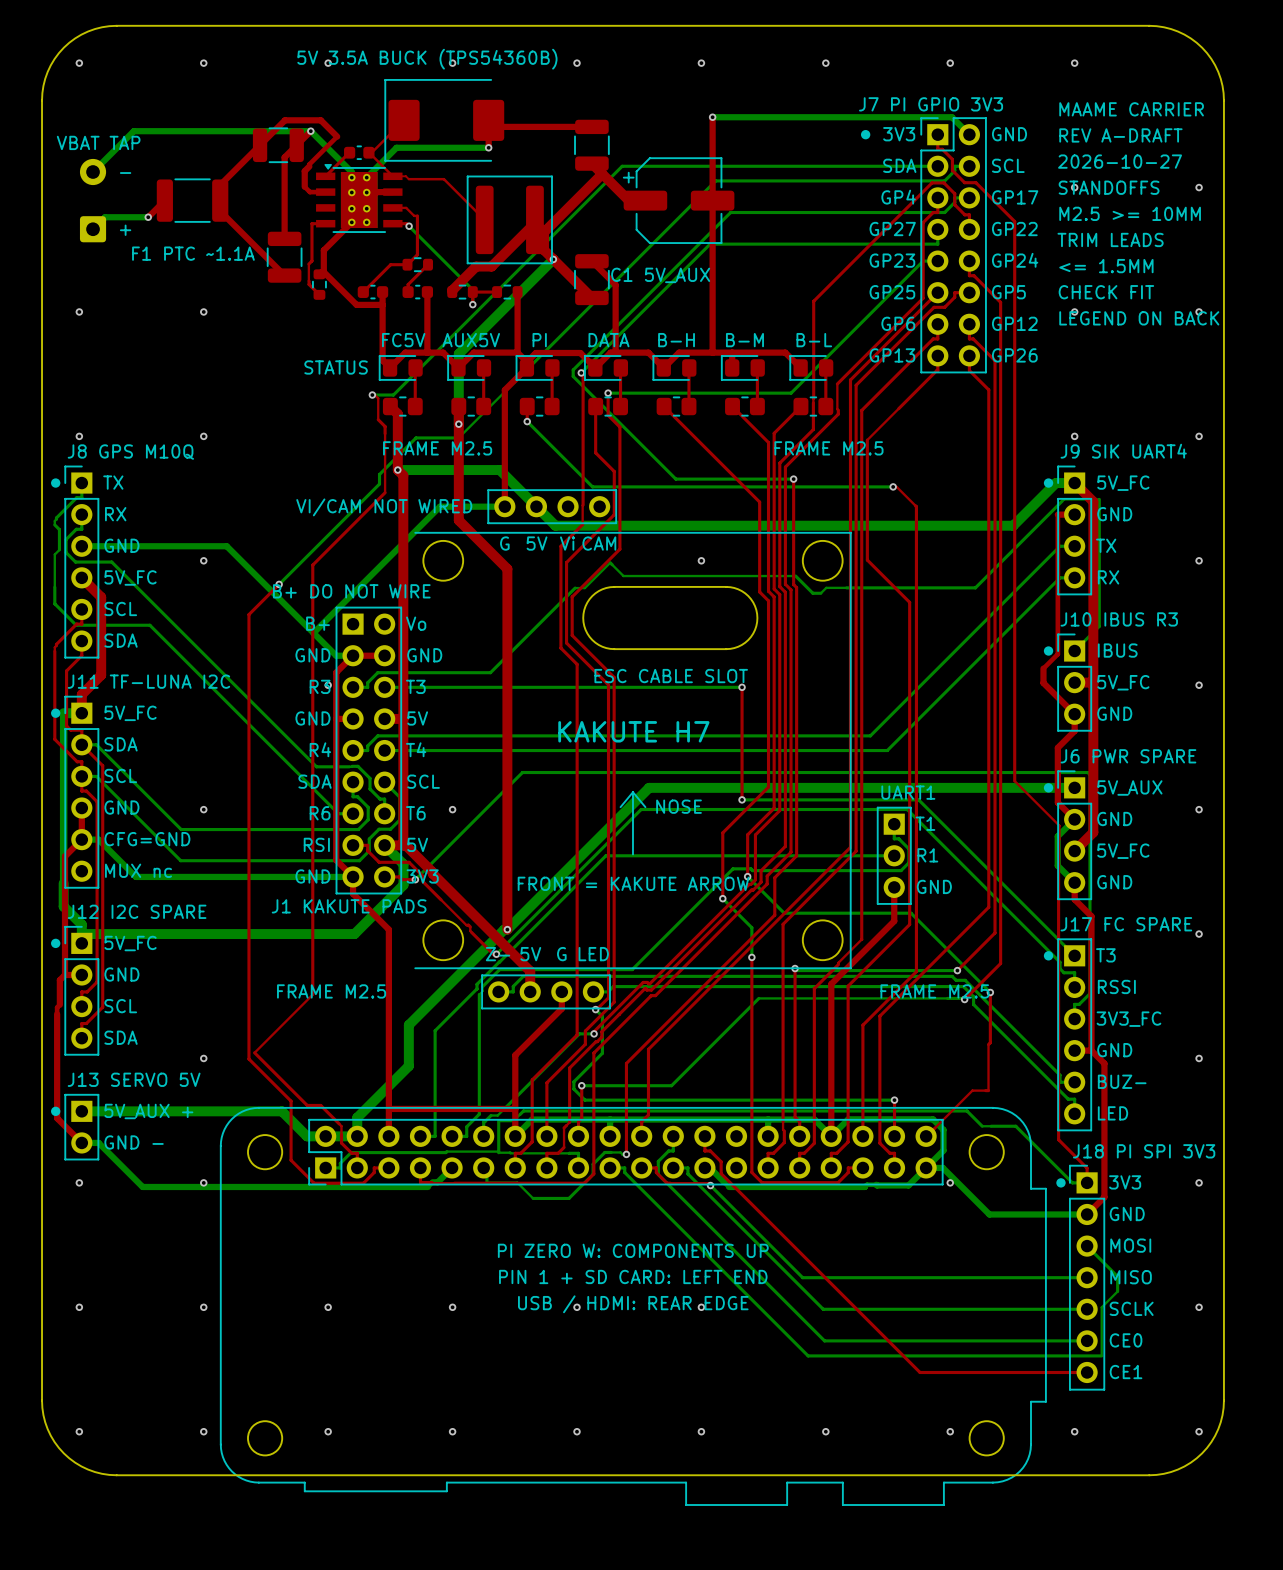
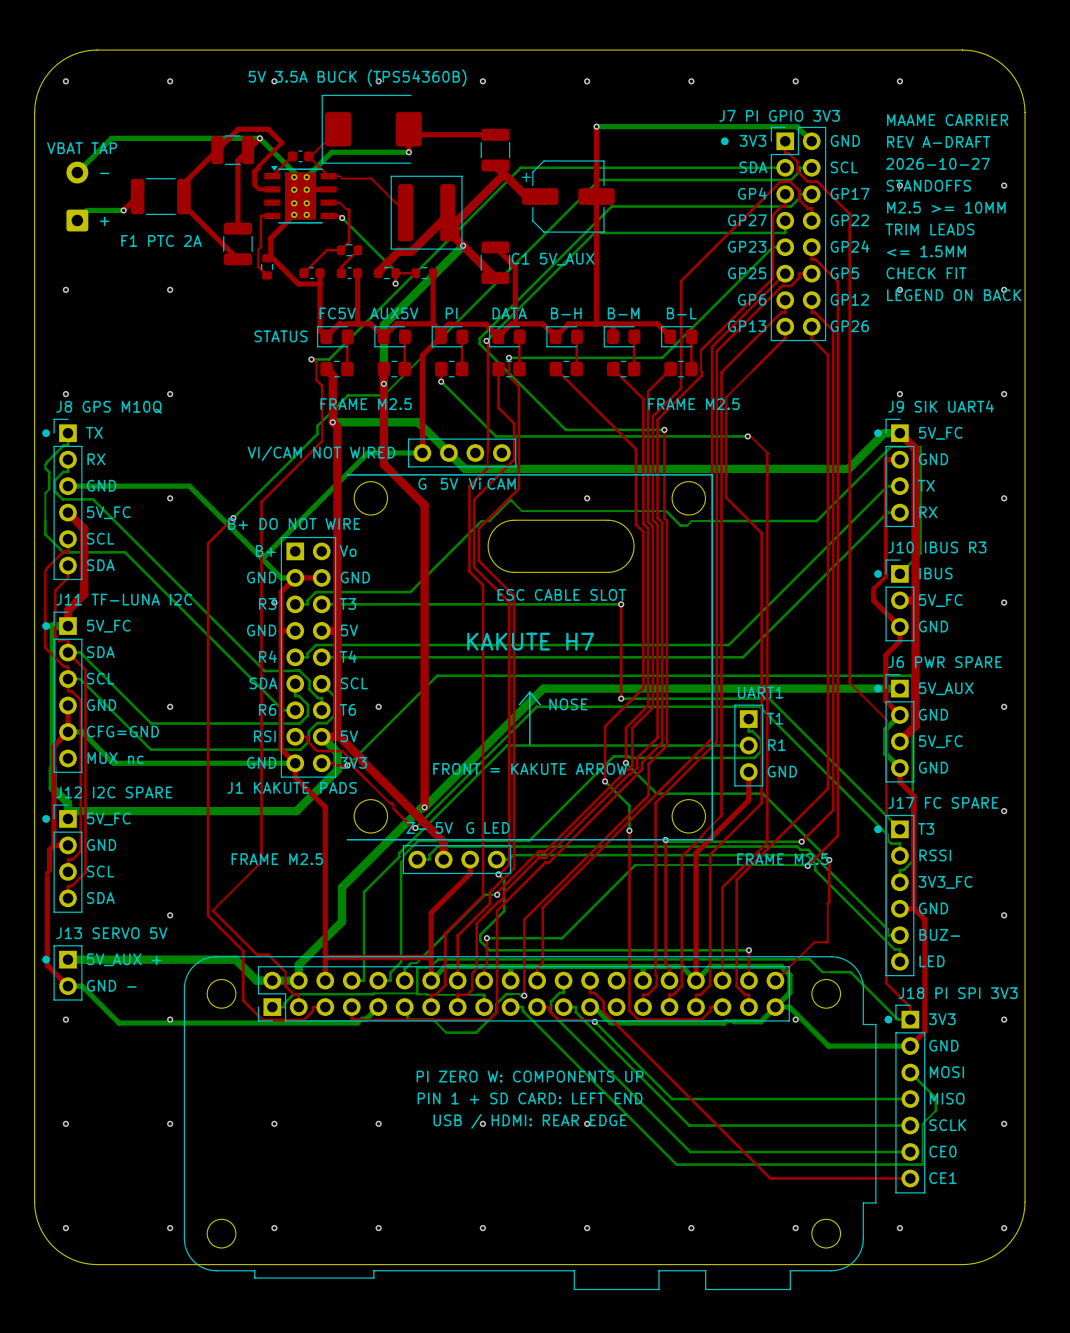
text: F1 PTC ~1.1A (193, 253) -> F1 PTC 2A (161, 240)

